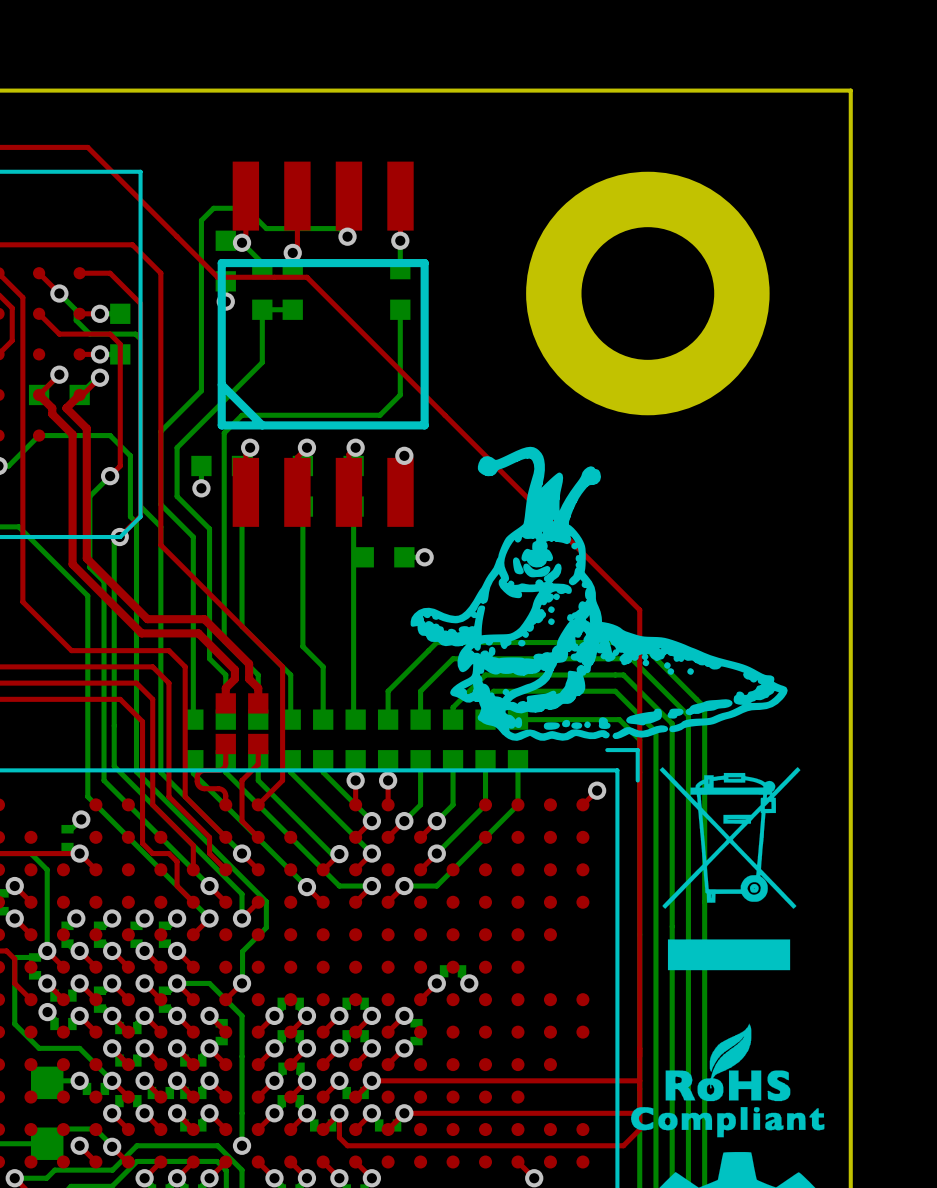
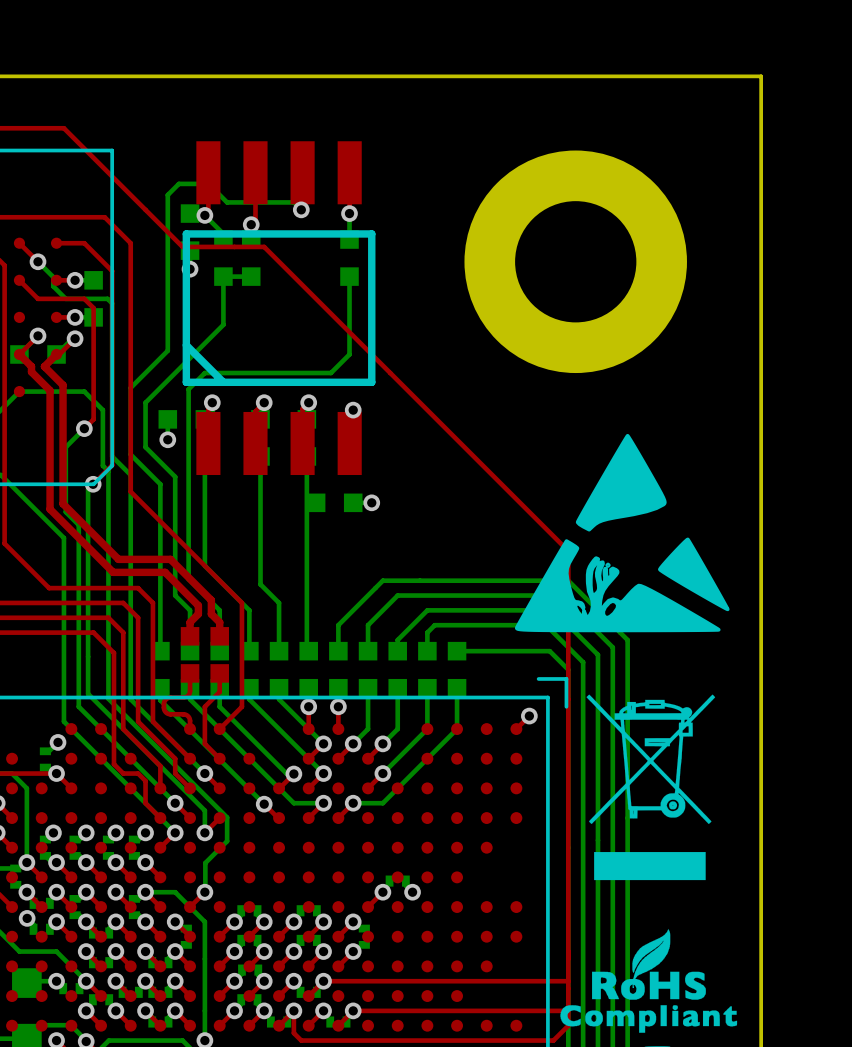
drawing: [410, 446, 788, 741] -> none
drawing: none -> [514, 433, 730, 633]

